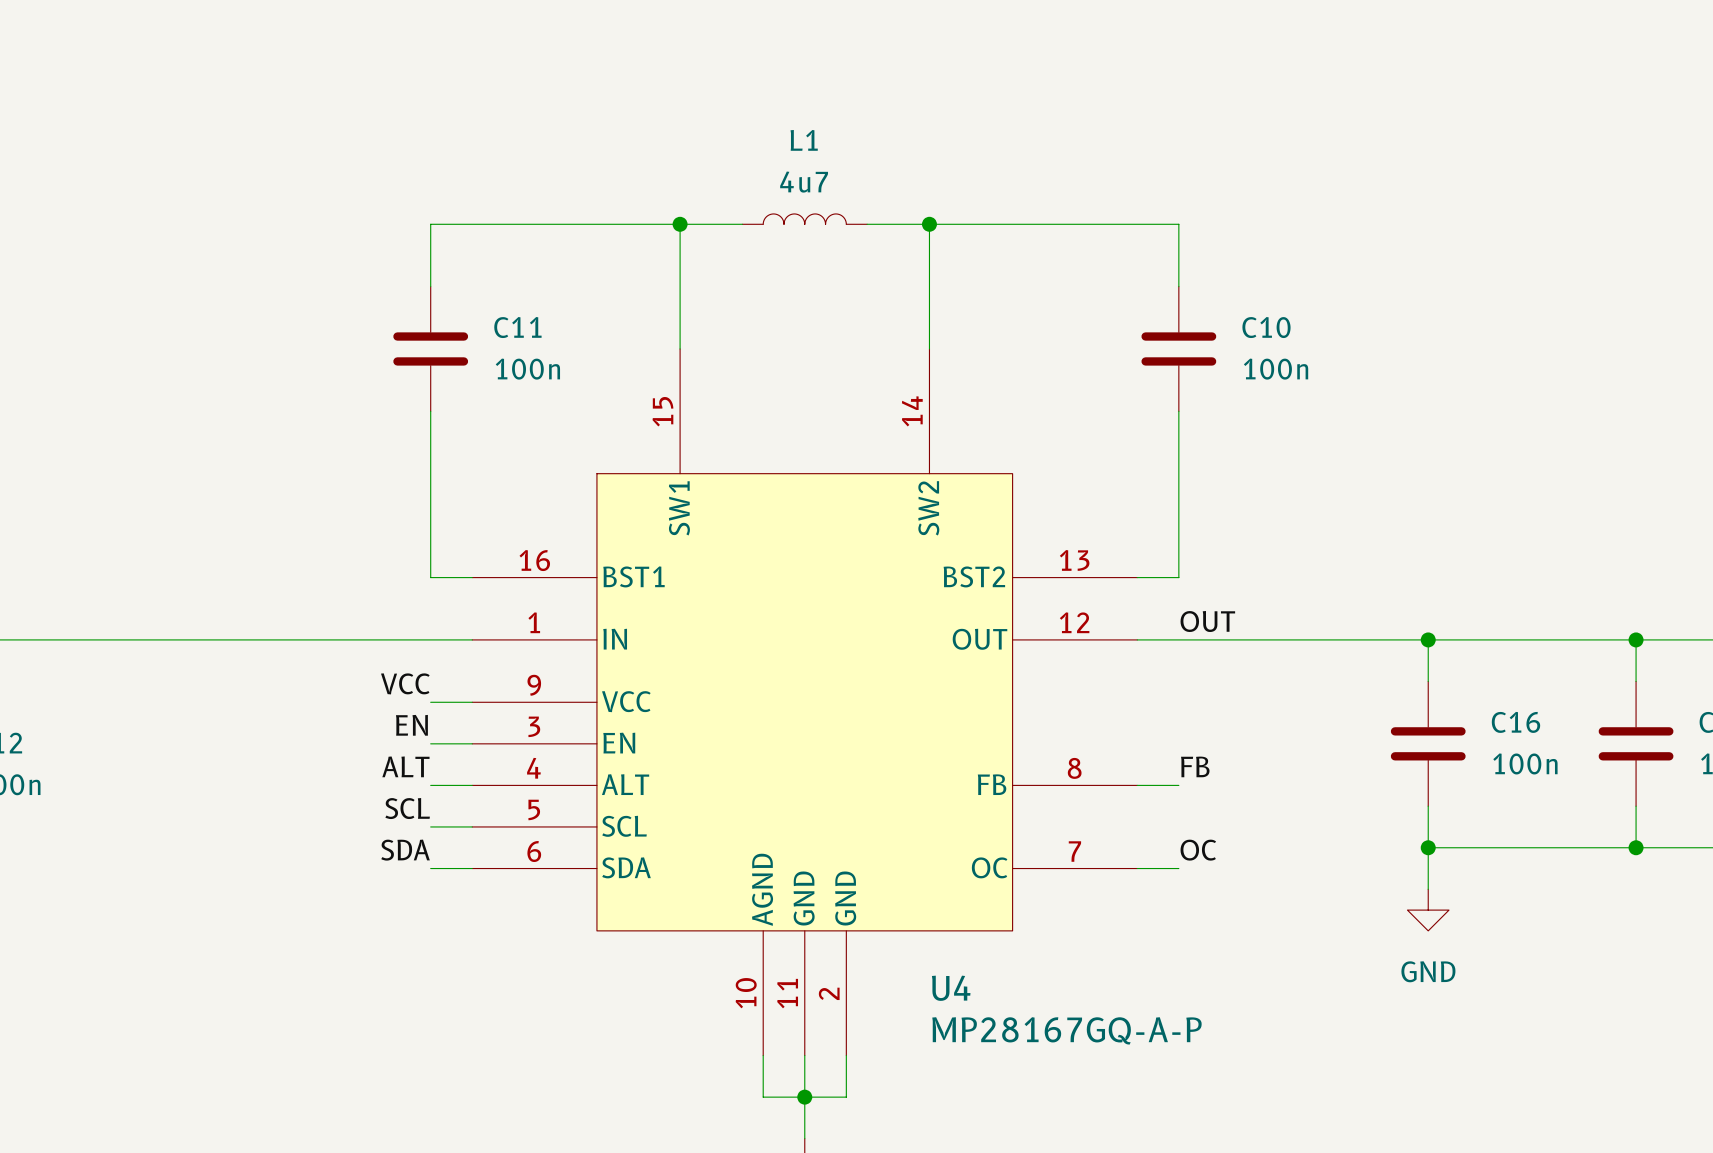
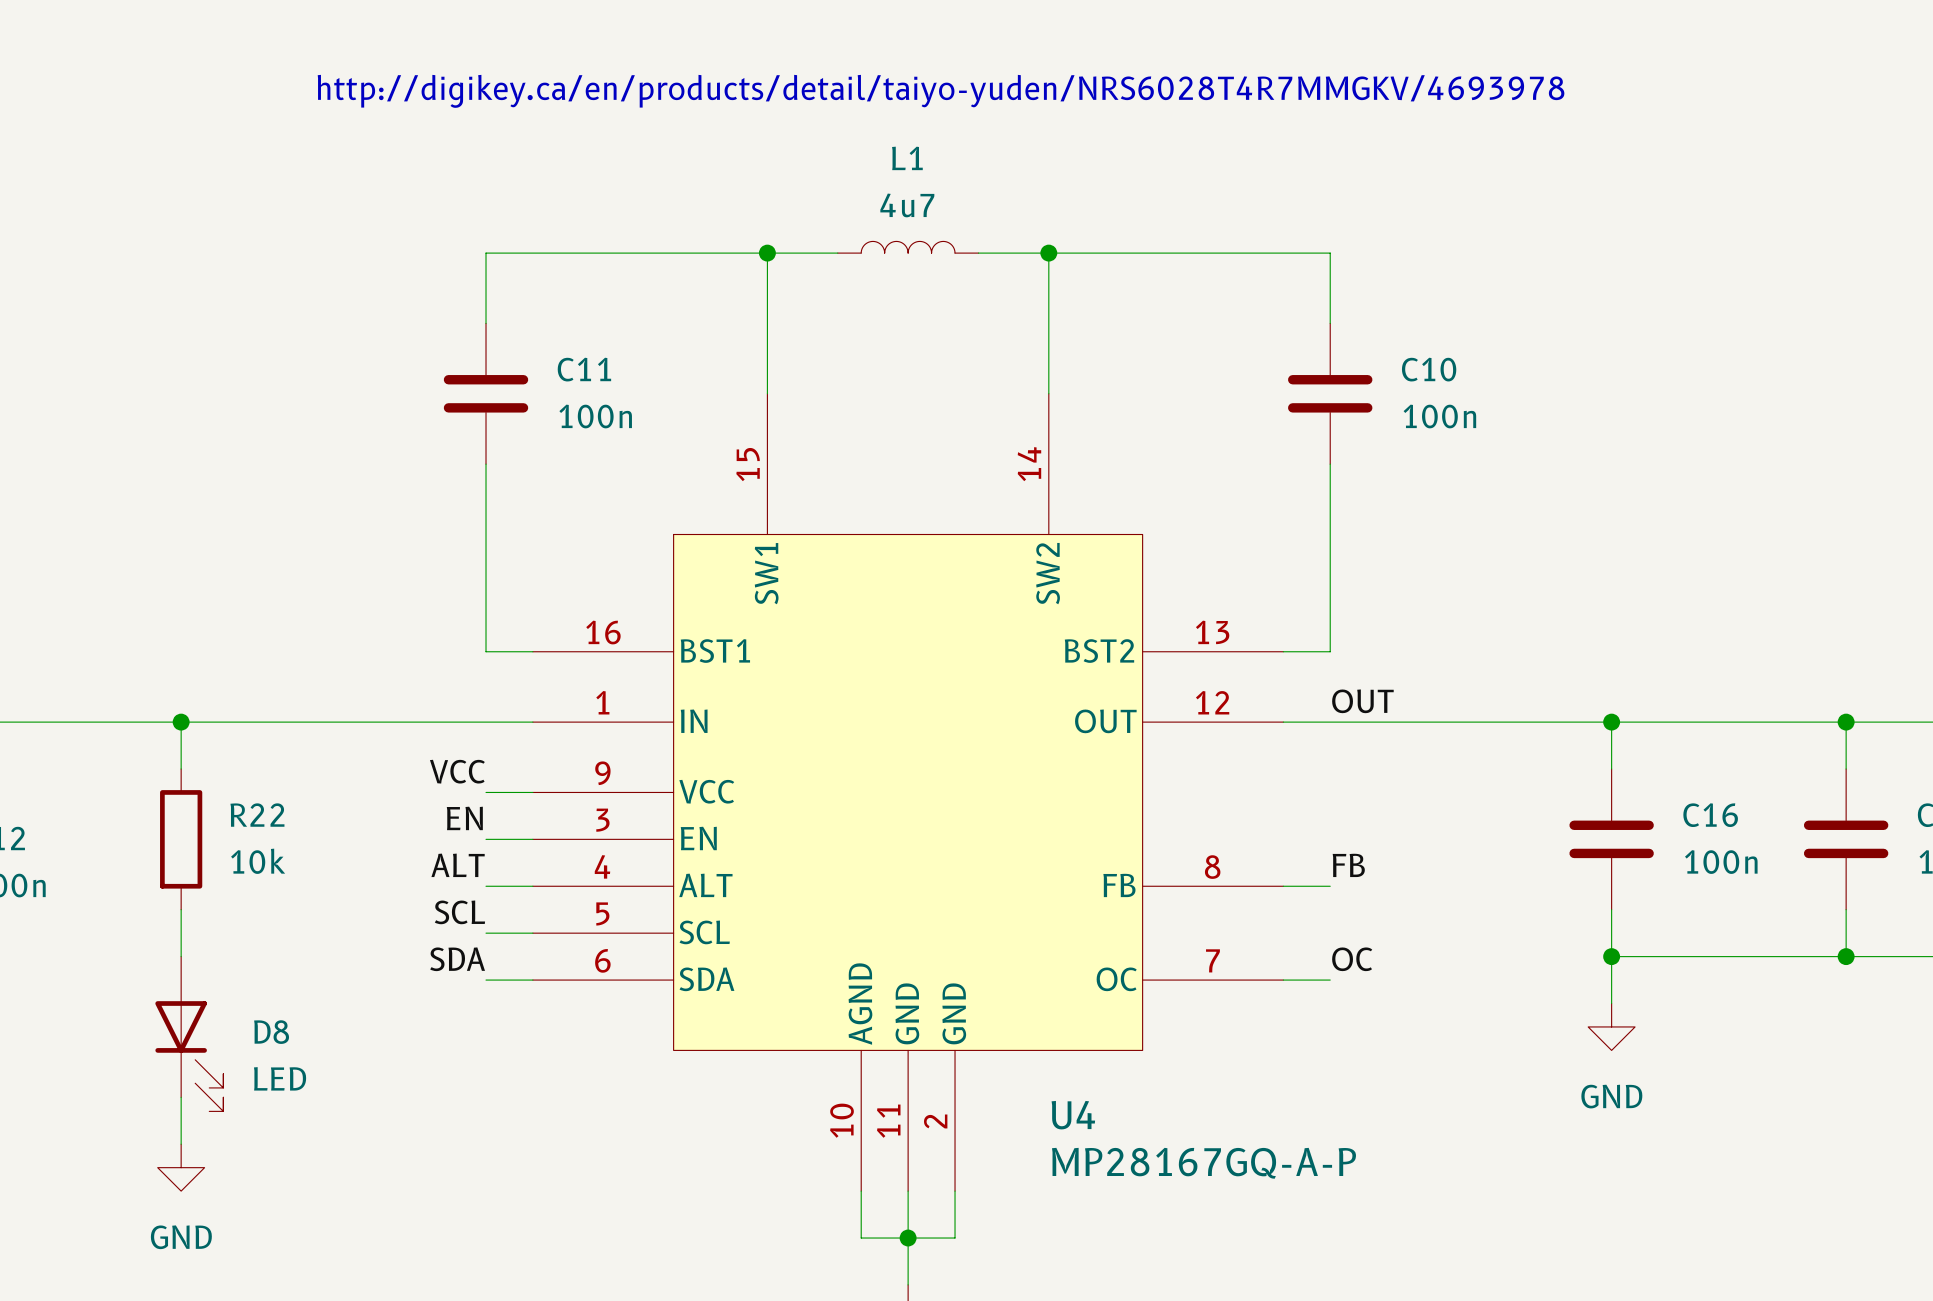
text: none -> http://digikey.ca/en/products/detail/taiyo-yuden/NRS6028T4R7MMGKV/4693978 (941, 91)
wire: none -> (181, 722) (181, 769)
junction: none -> (181, 722)
R22: none -> 10k (181, 839)
wire: none -> (181, 909) (181, 956)
D8: none -> LED (189, 1033)
wire: none -> (181, 1097) (181, 1144)
power symbol: none -> GND (181, 1167)

